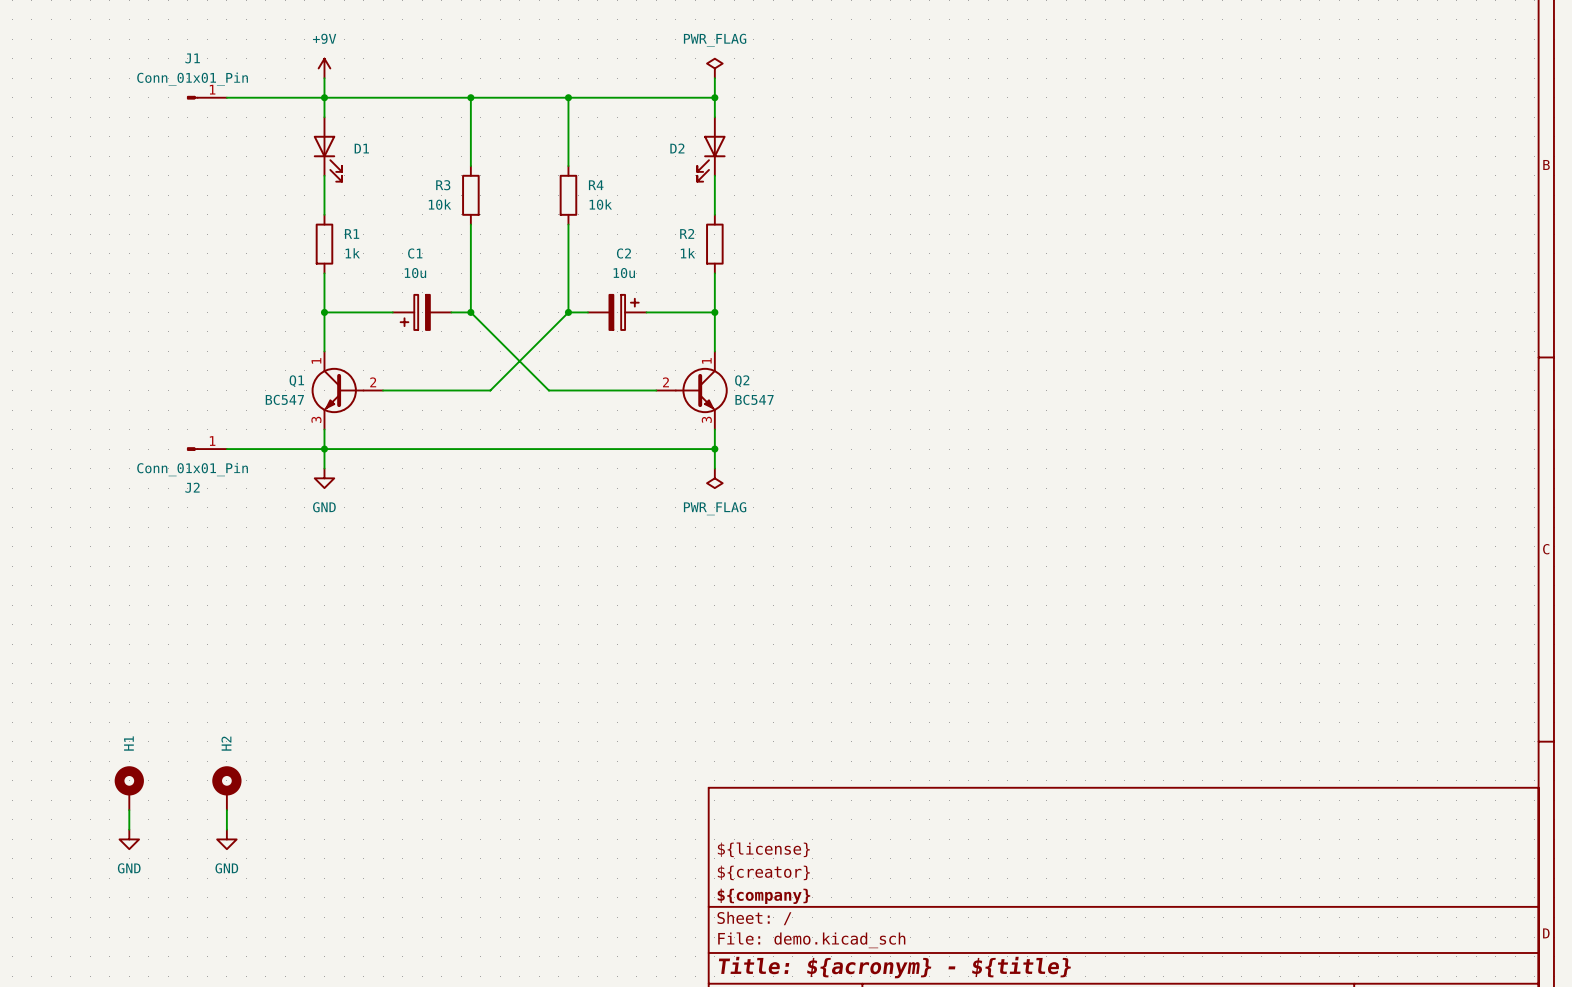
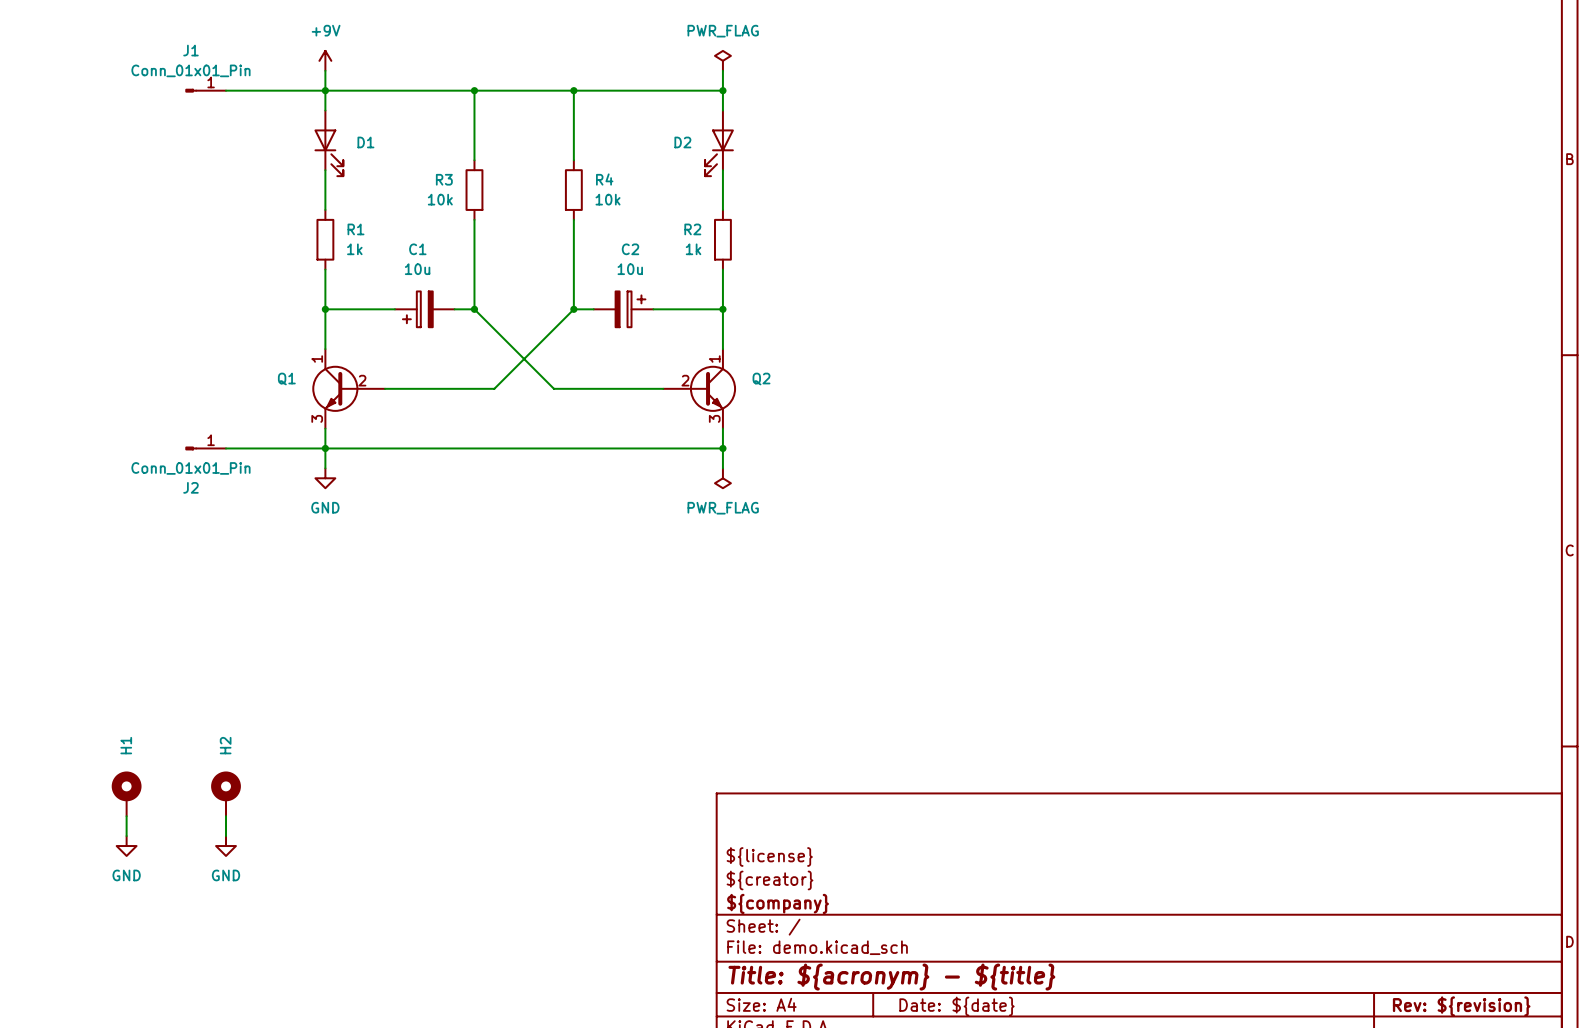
Q1 symbol: [311, 351, 384, 430] -> [312, 349, 386, 429]
Q2 symbol: [656, 351, 728, 430] -> [663, 349, 737, 429]
Q1 value: BC547 (284, 399) -> none
Q2 value: BC547 (754, 399) -> none

